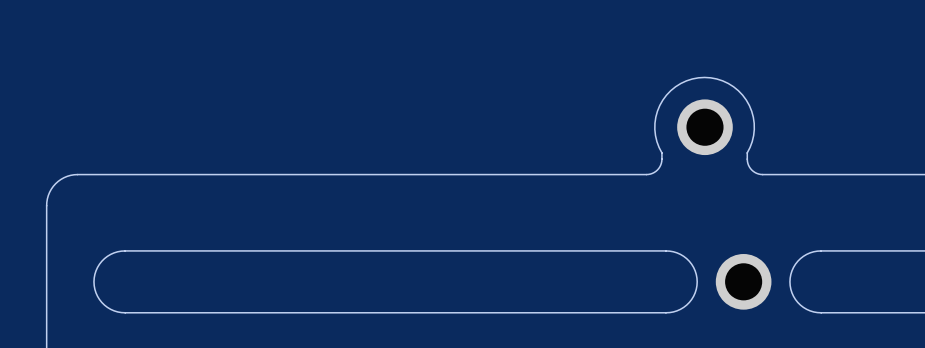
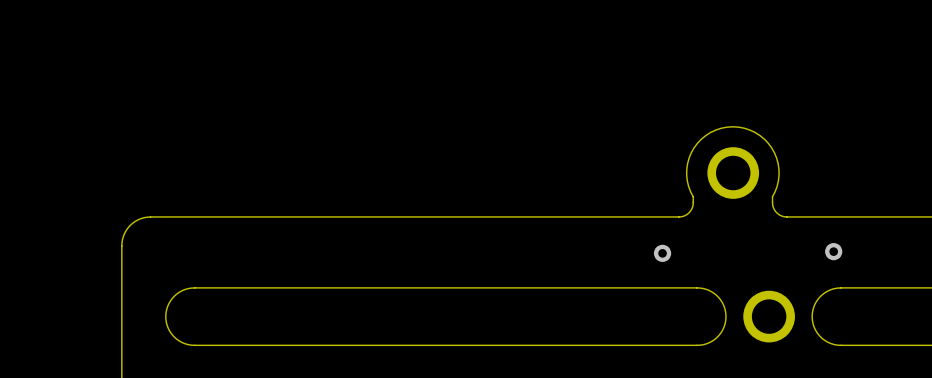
via: none -> (833, 251)
via: none -> (662, 253)

